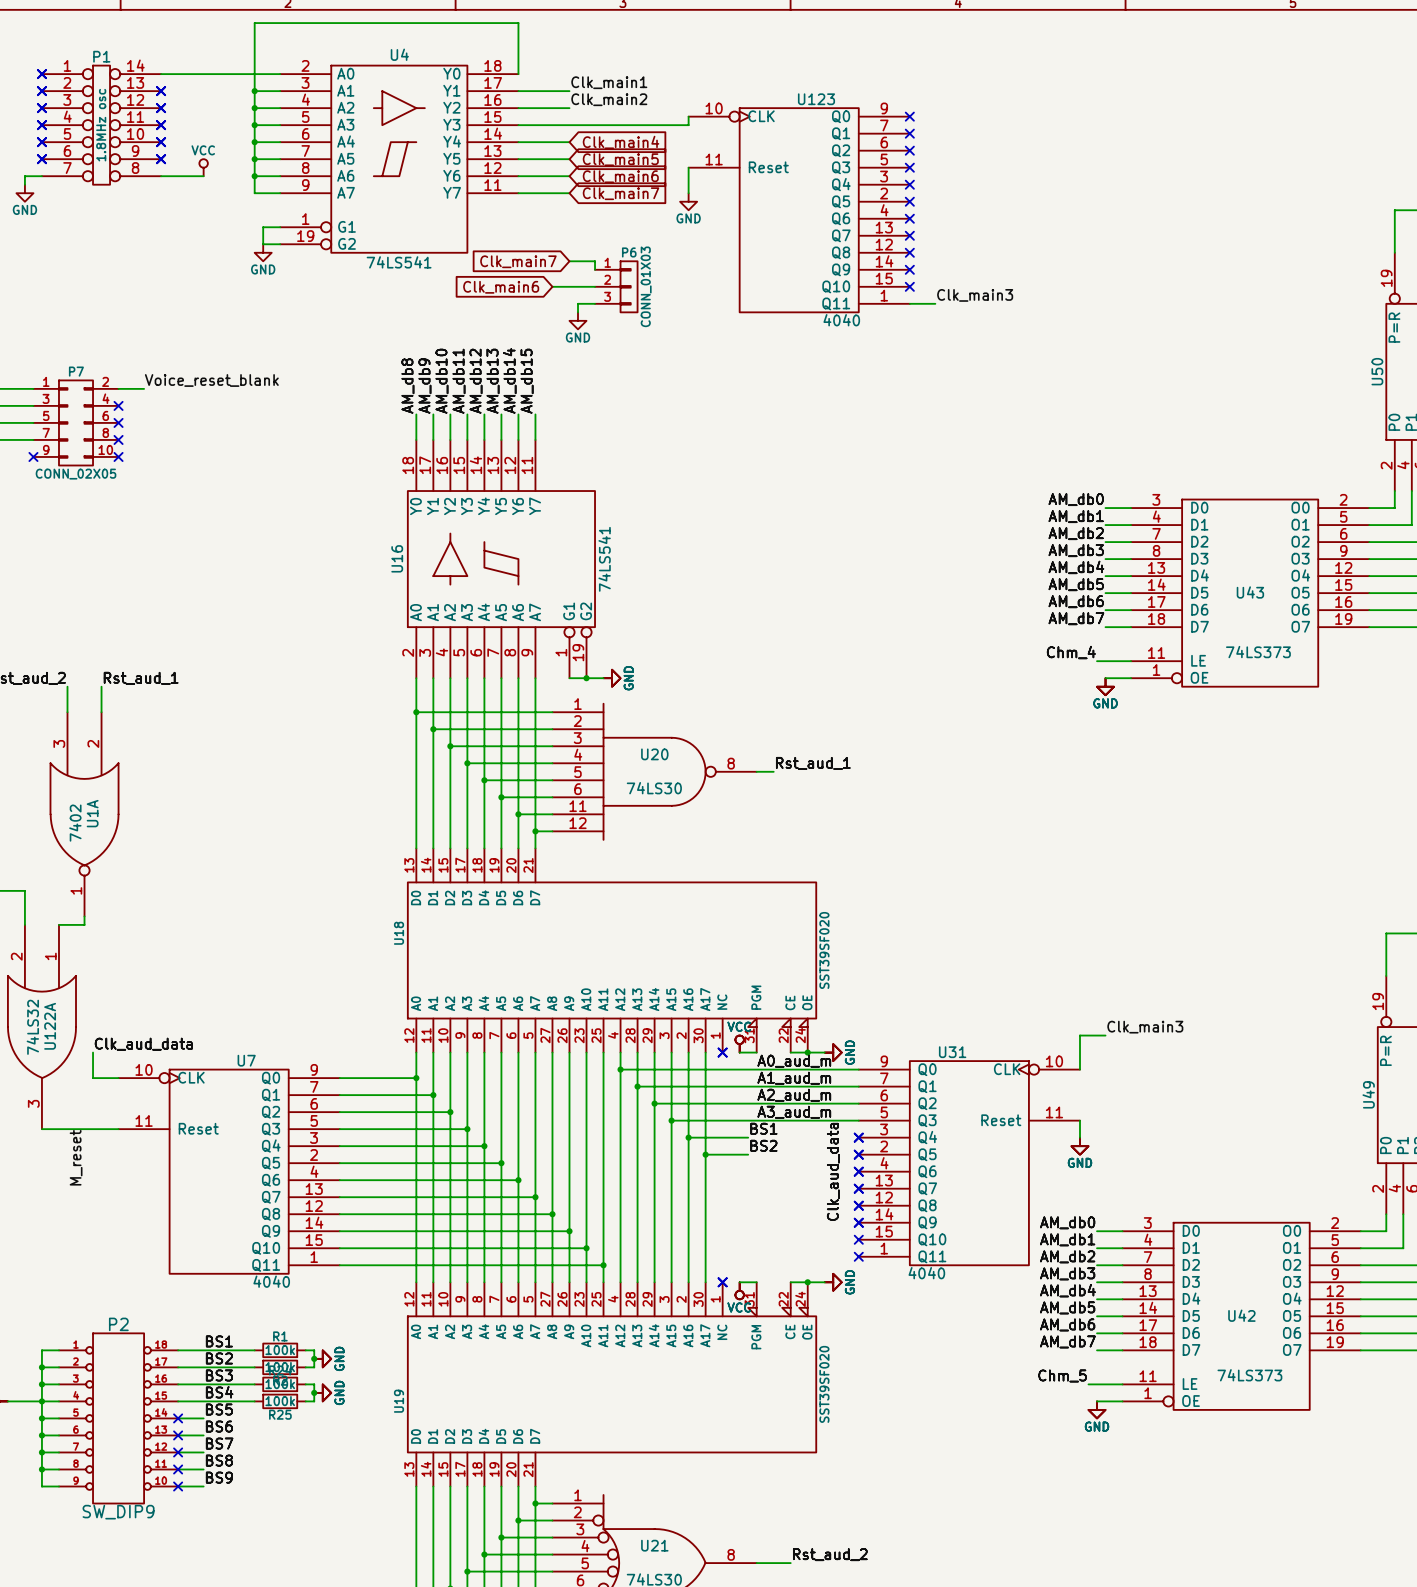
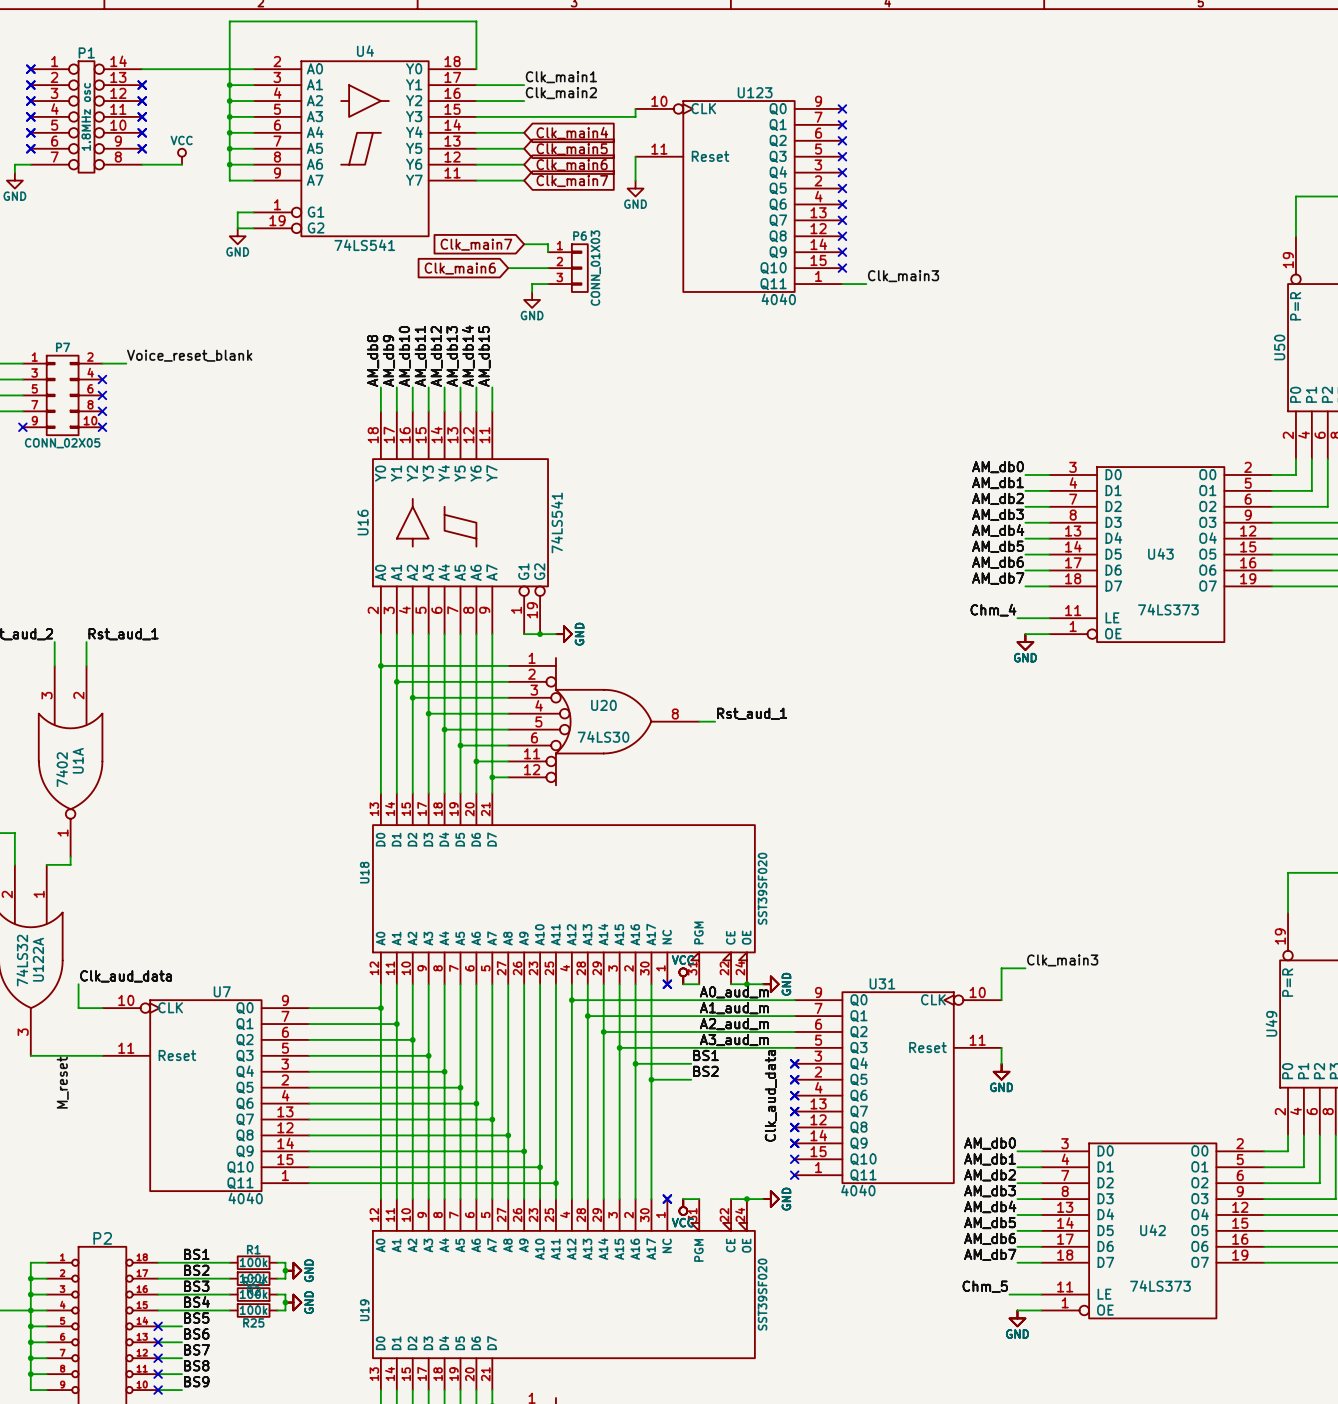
U20 symbol: [552, 703, 757, 840] -> [508, 658, 700, 786]

